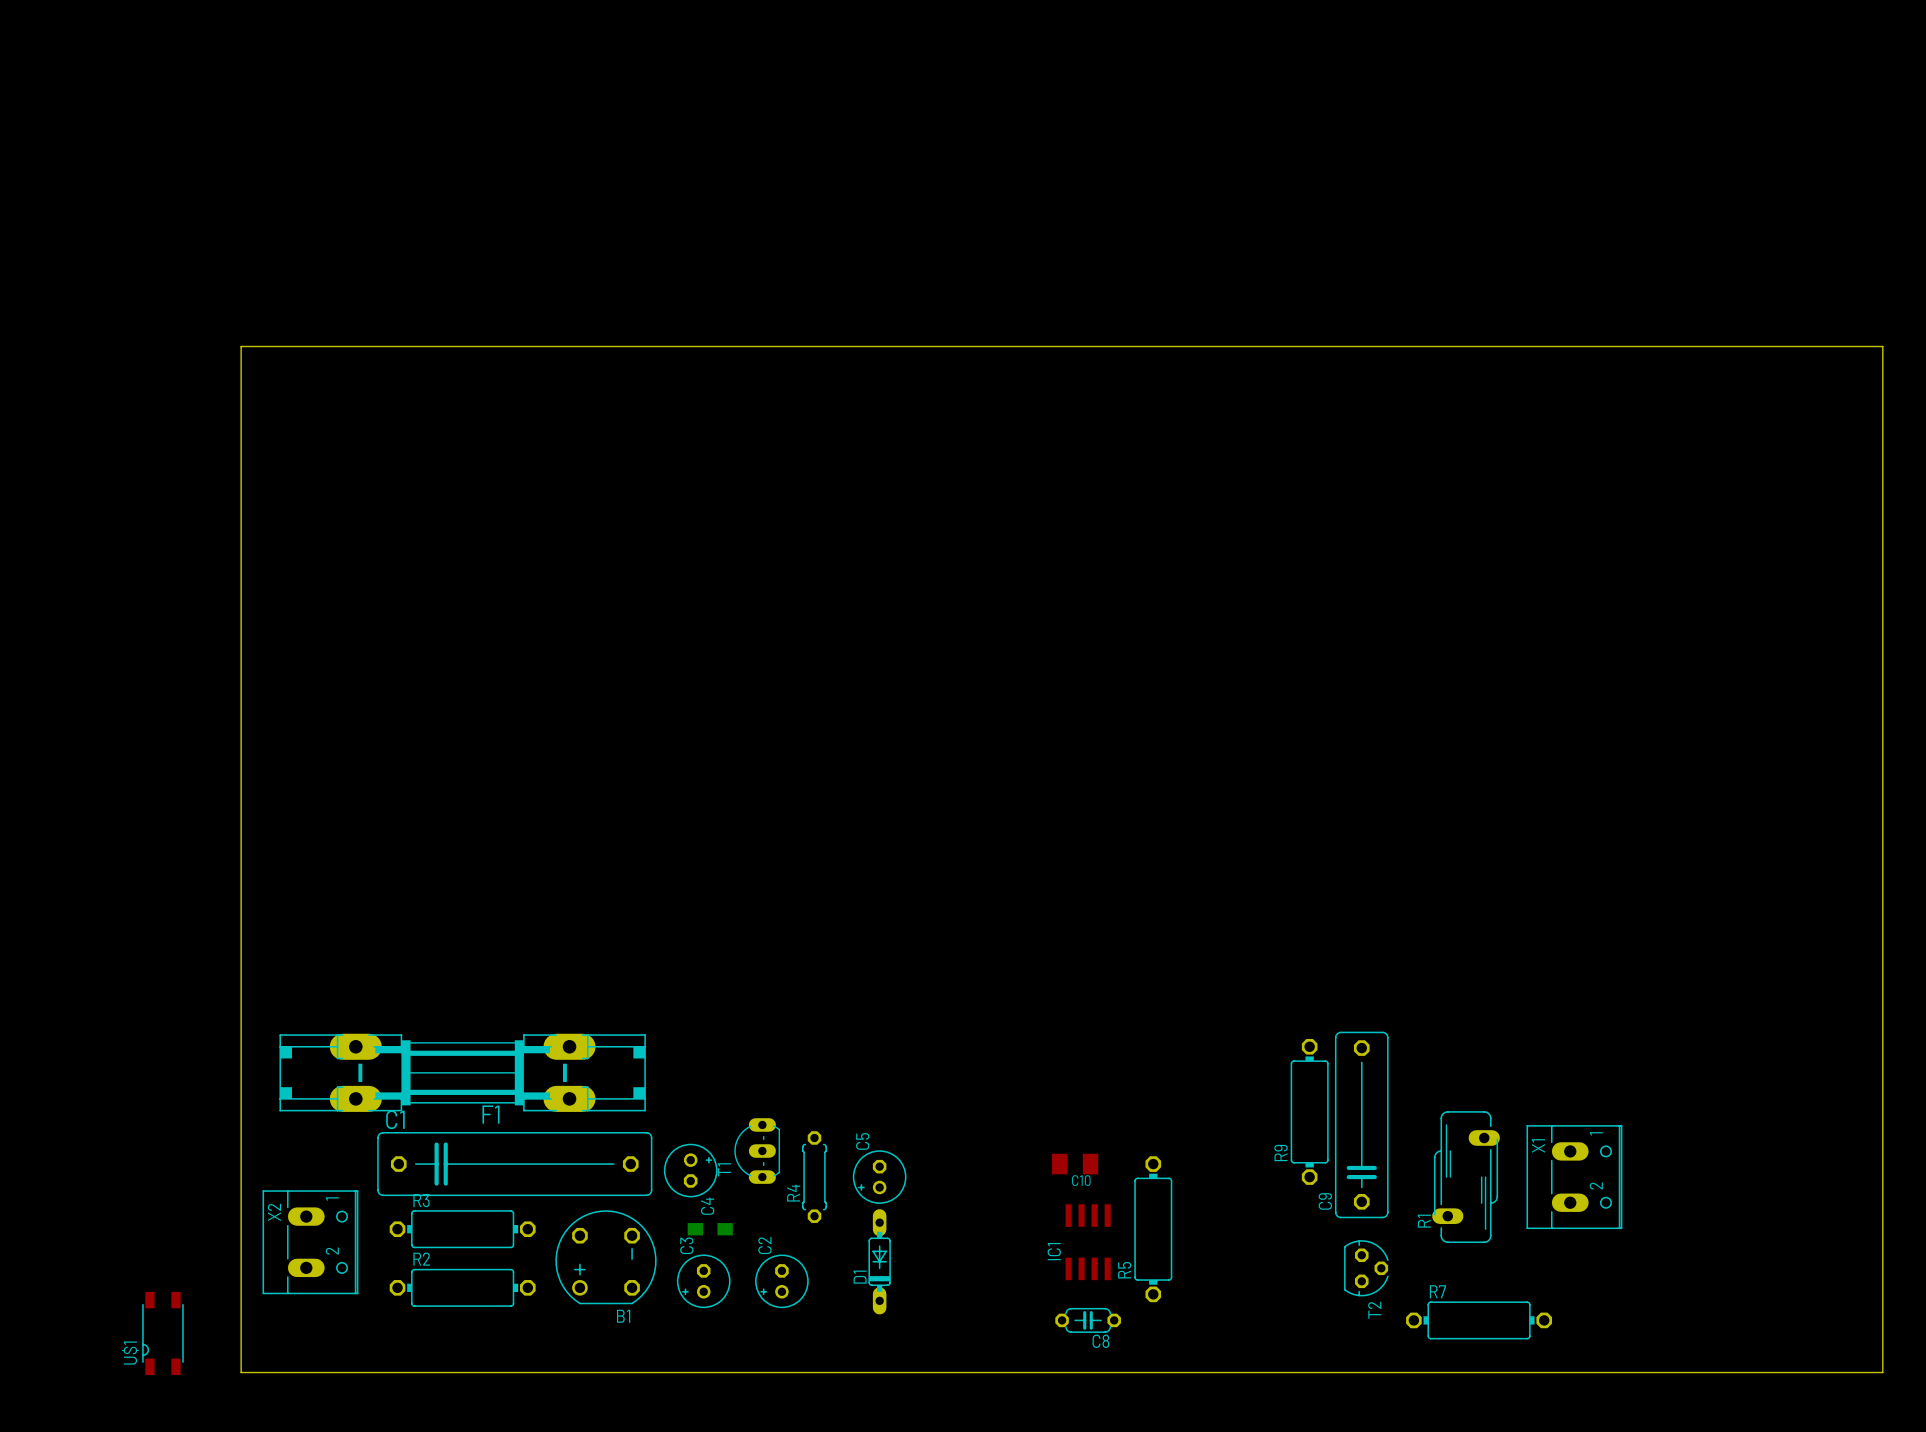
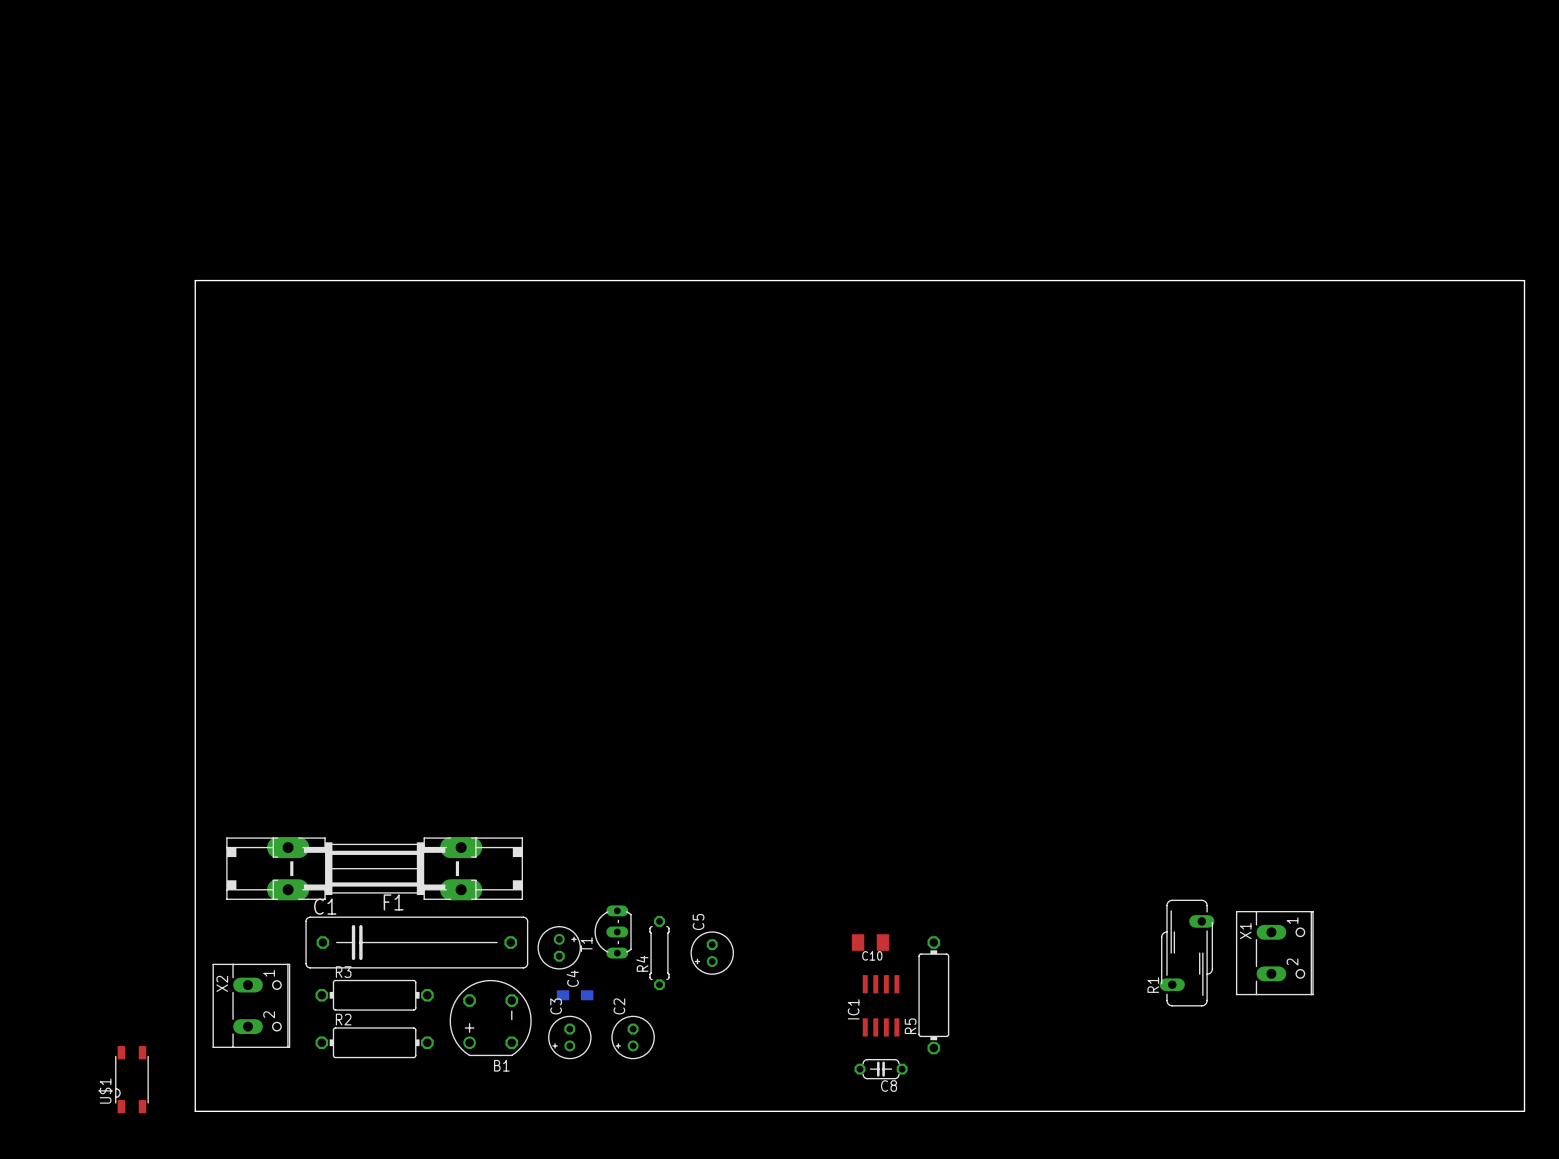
R9: (1309, 1111) -> none
C9: (1361, 1124) -> none
D1: (879, 1261) -> none
T2: (1366, 1268) -> none
R7: (1479, 1320) -> none

